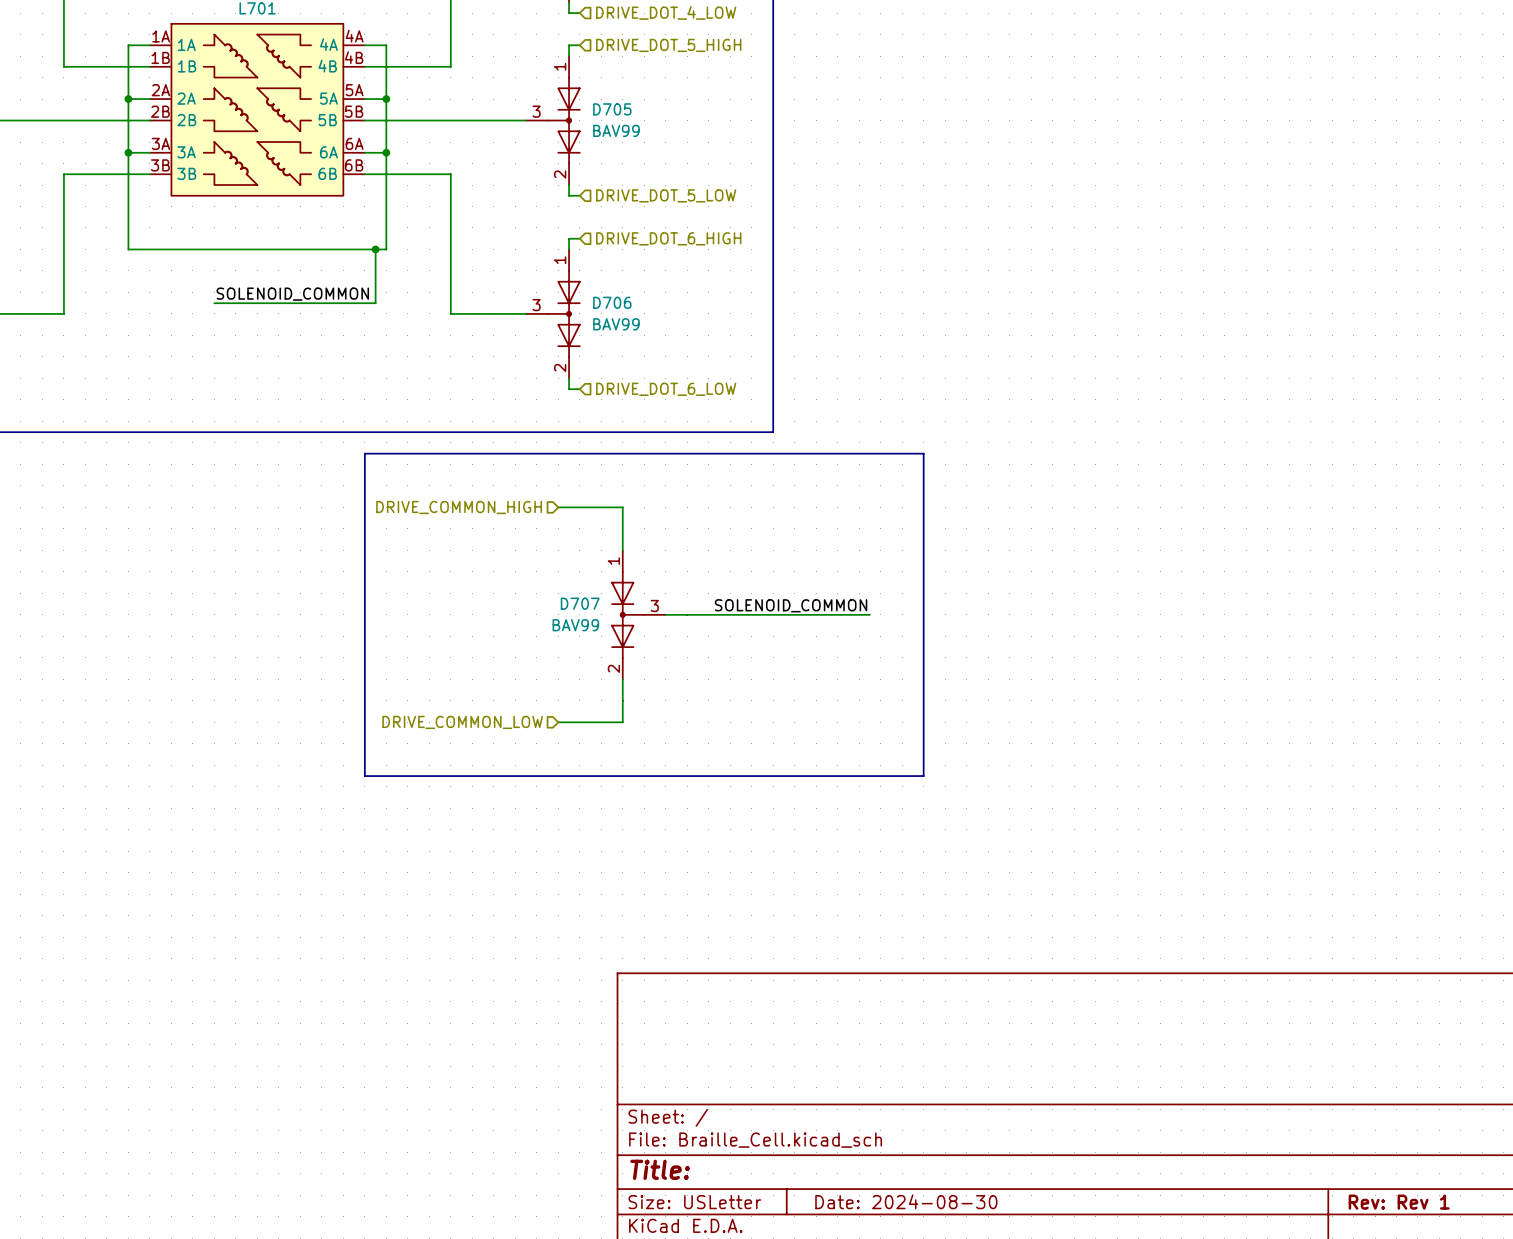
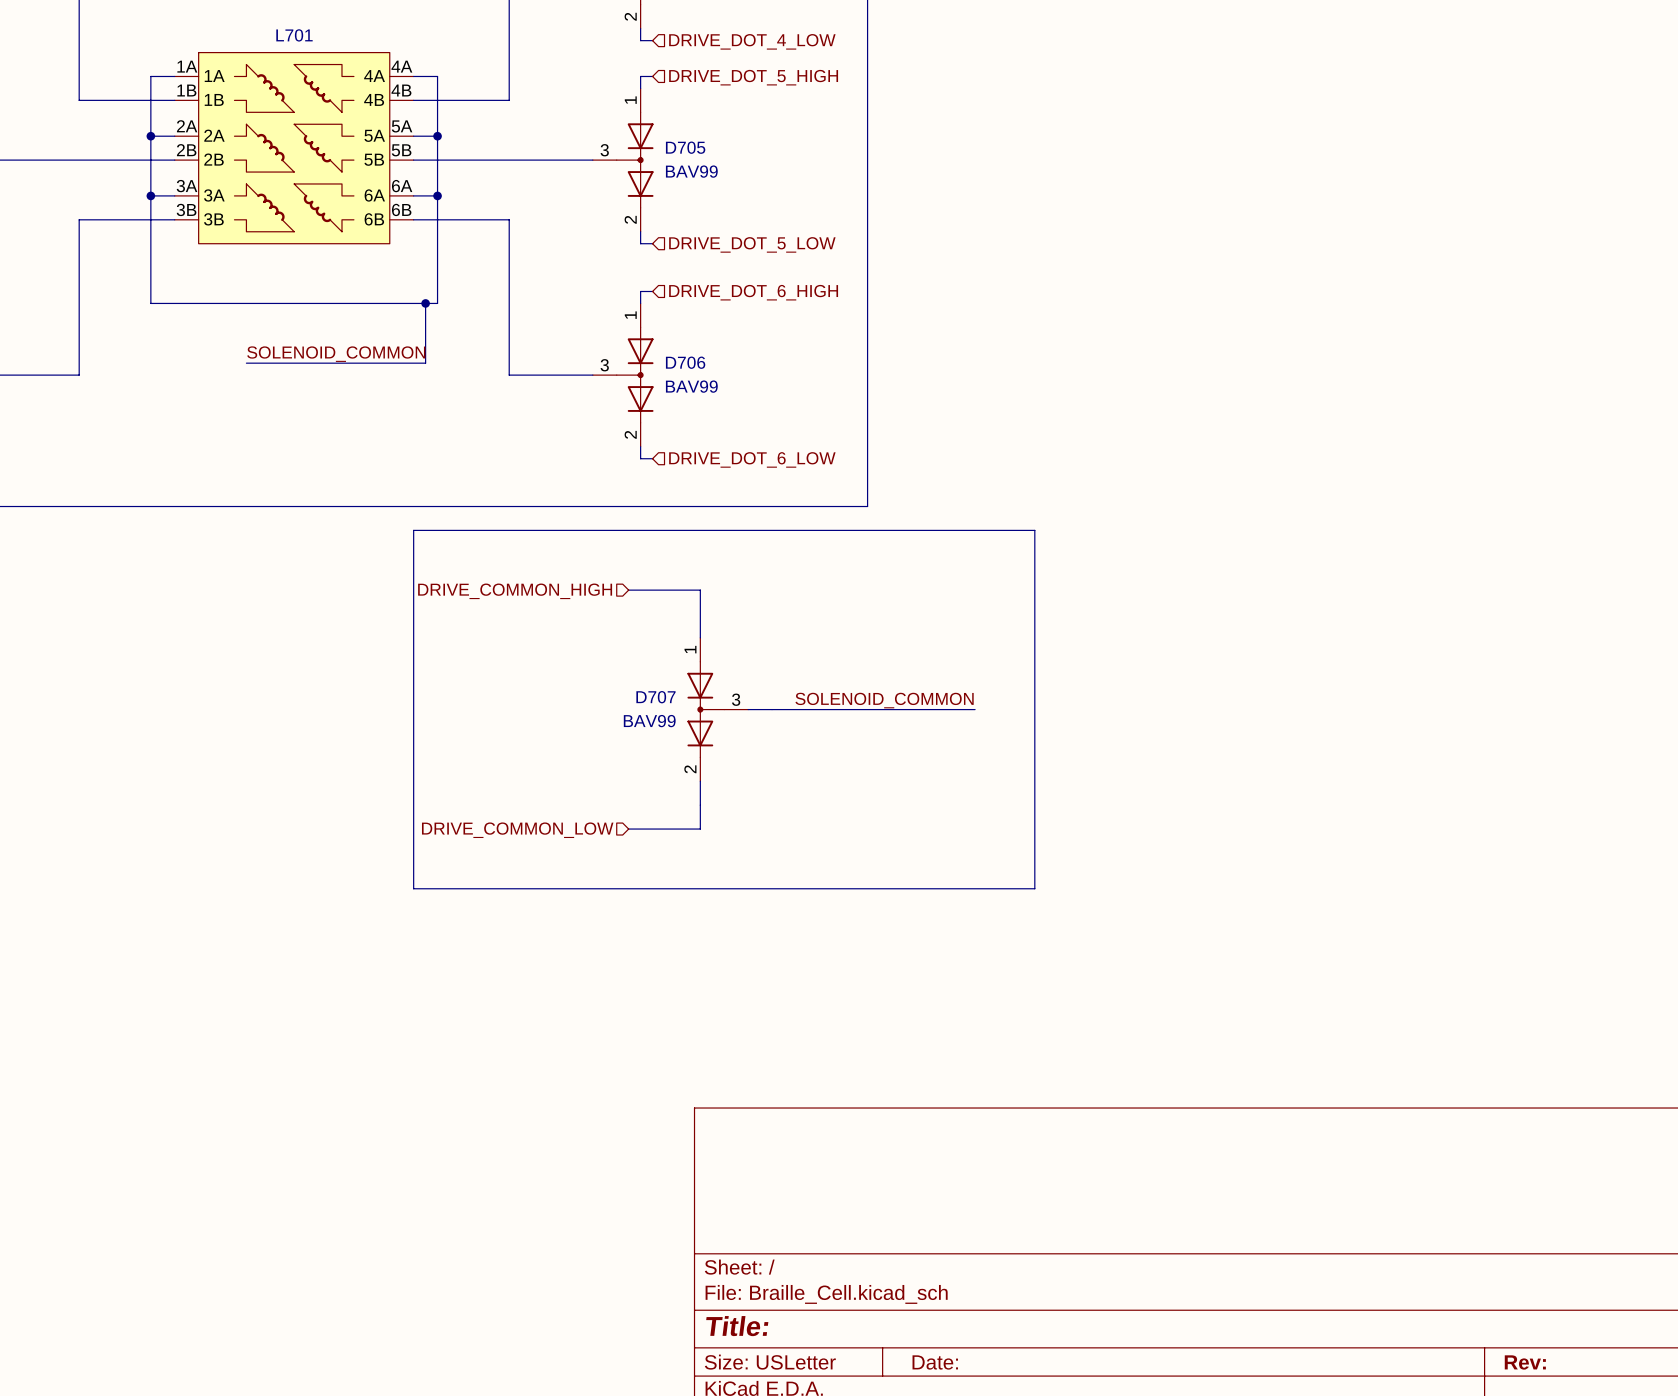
title block: Date: 2024-08-30 (906, 1201) -> Date: (935, 1362)
title block: Rev: Rev 1 (1399, 1202) -> Rev: (1525, 1362)

